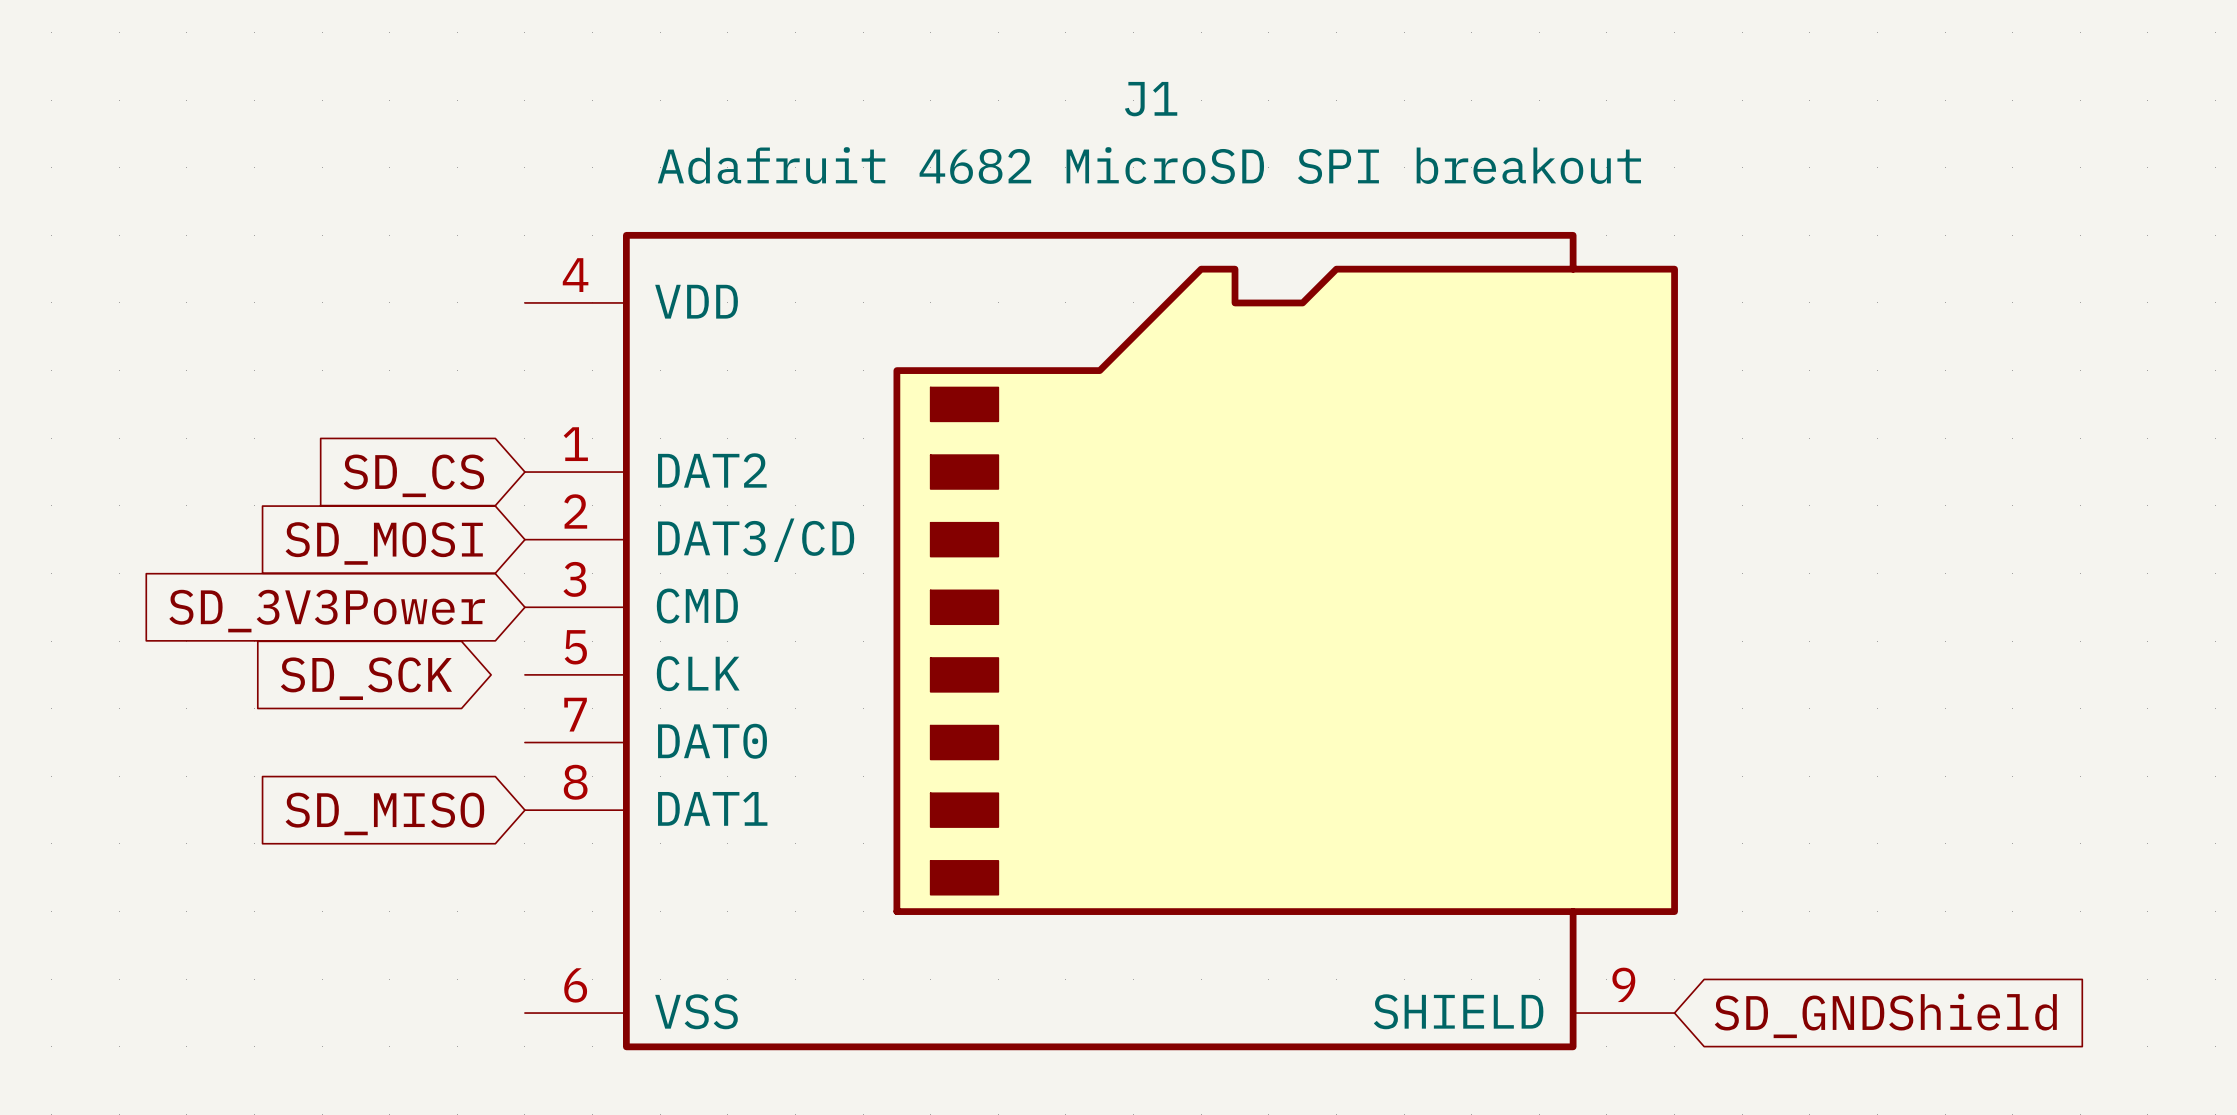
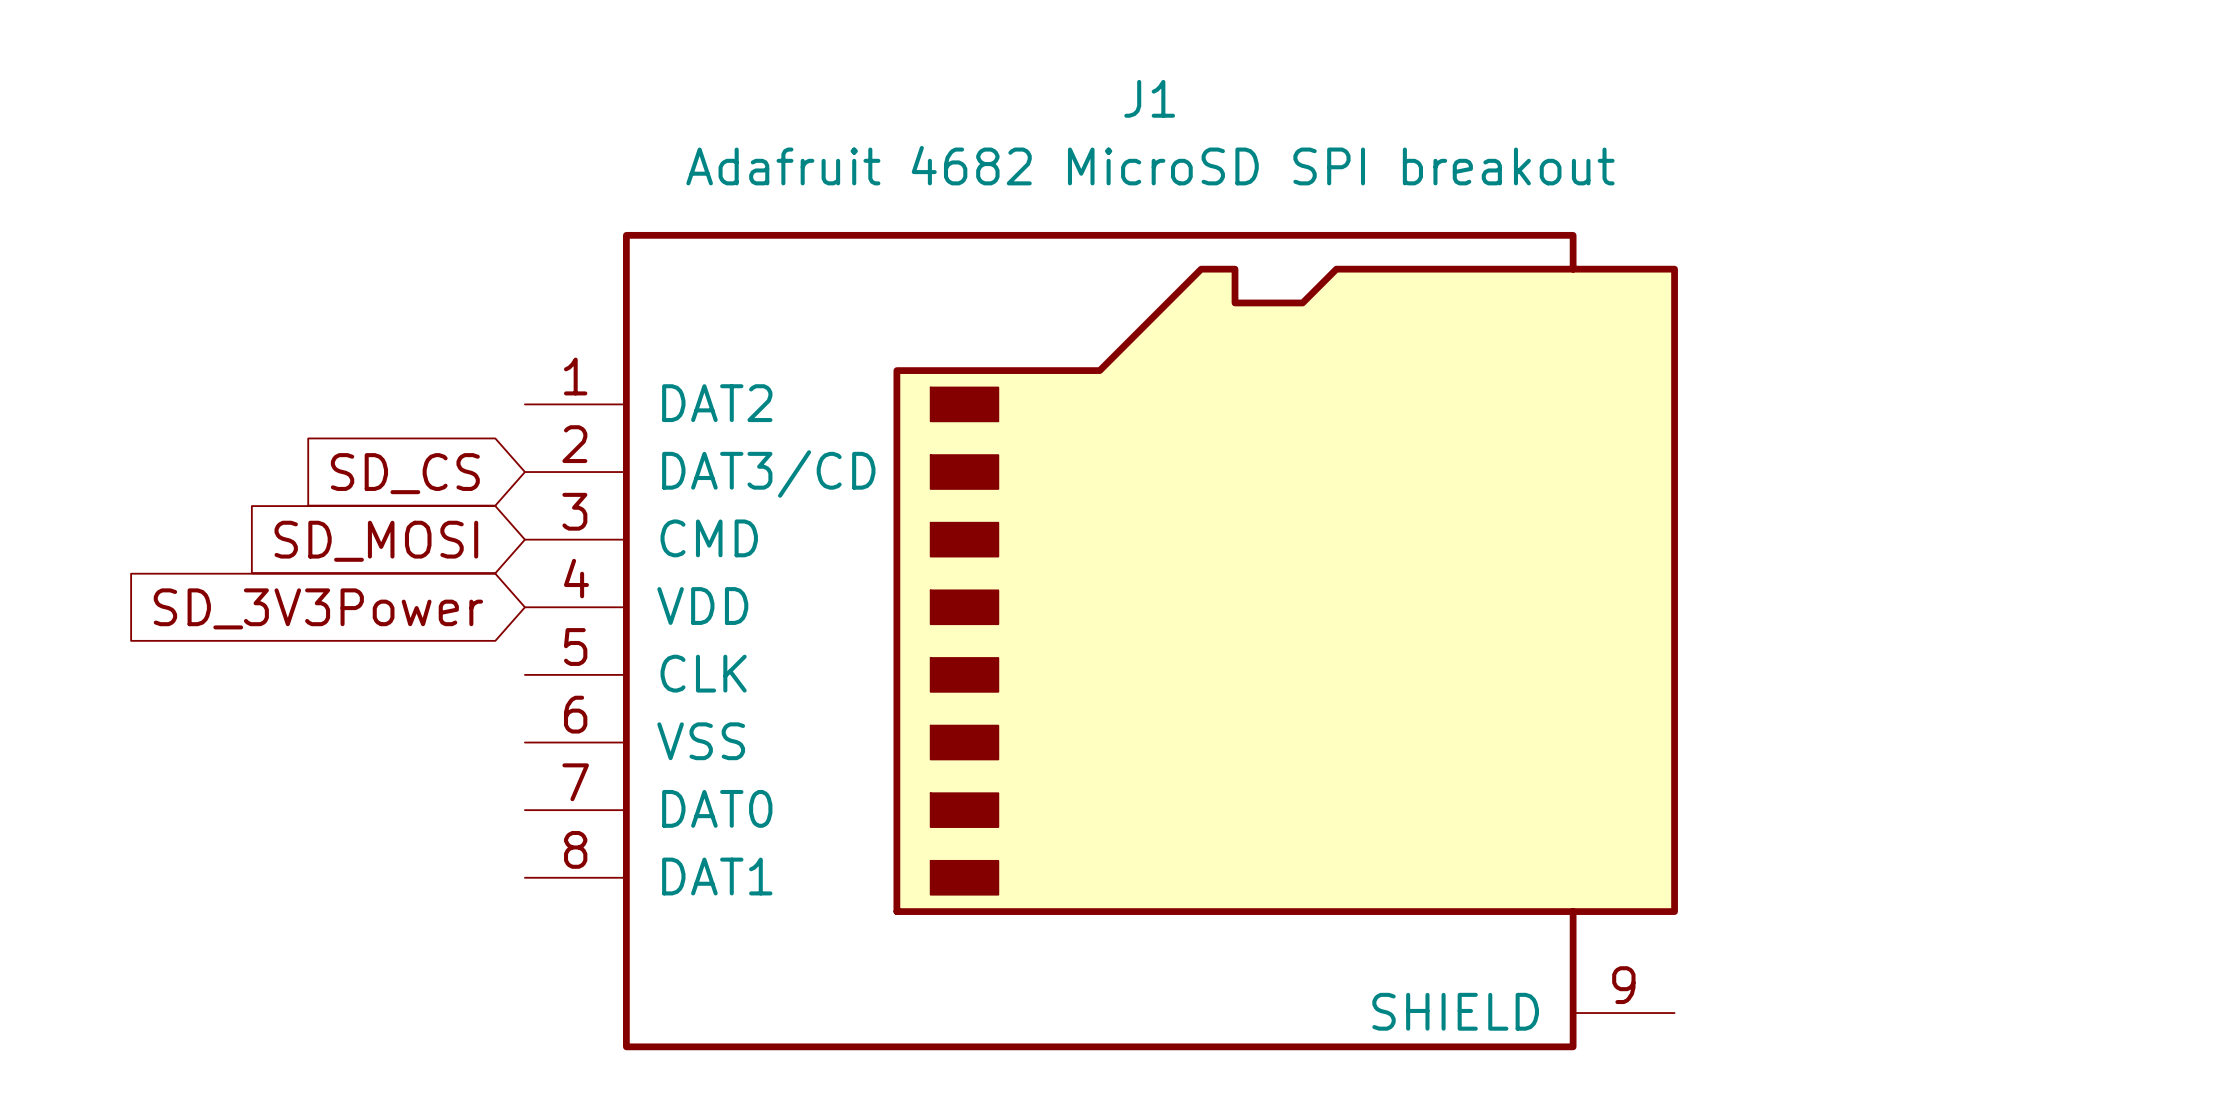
J1 symbol: [524, 231, 1678, 1051] -> [524, 231, 1678, 1051]
global label: SD_SCK (366, 678) -> none
global label: SD_MISO (384, 813) -> none
global label: SD_GNDShield (1885, 1015) -> none

